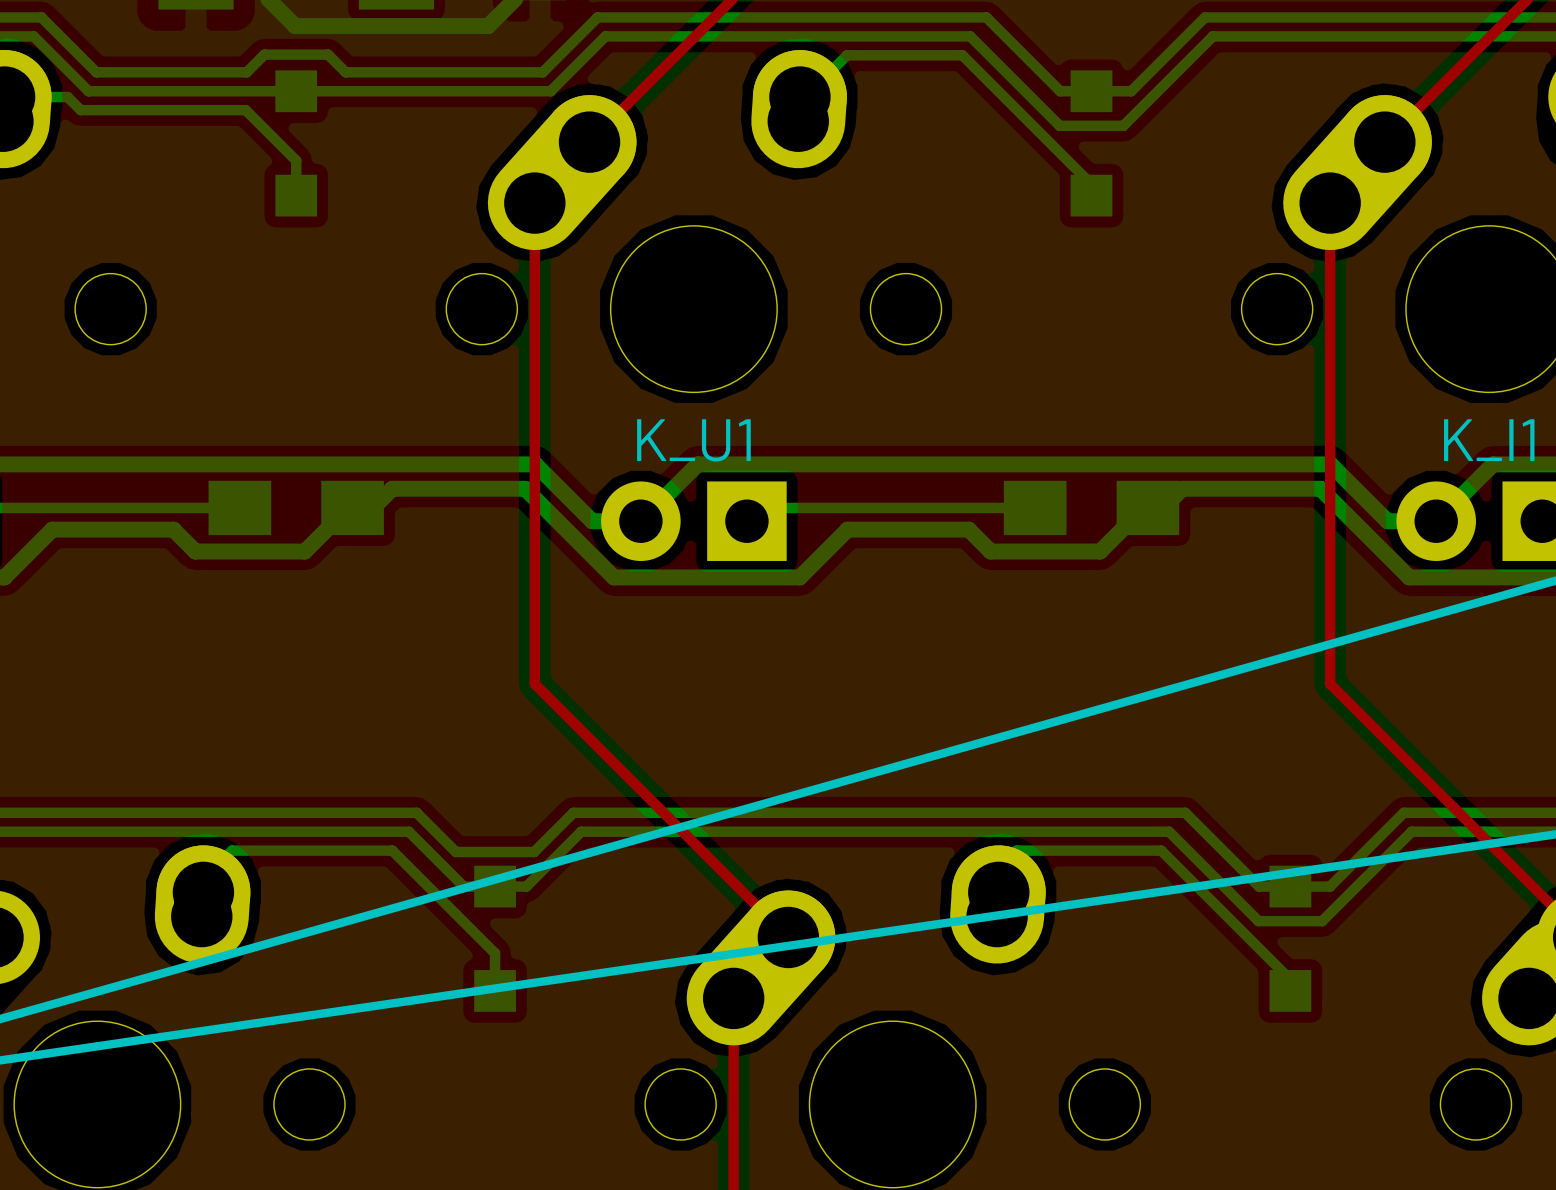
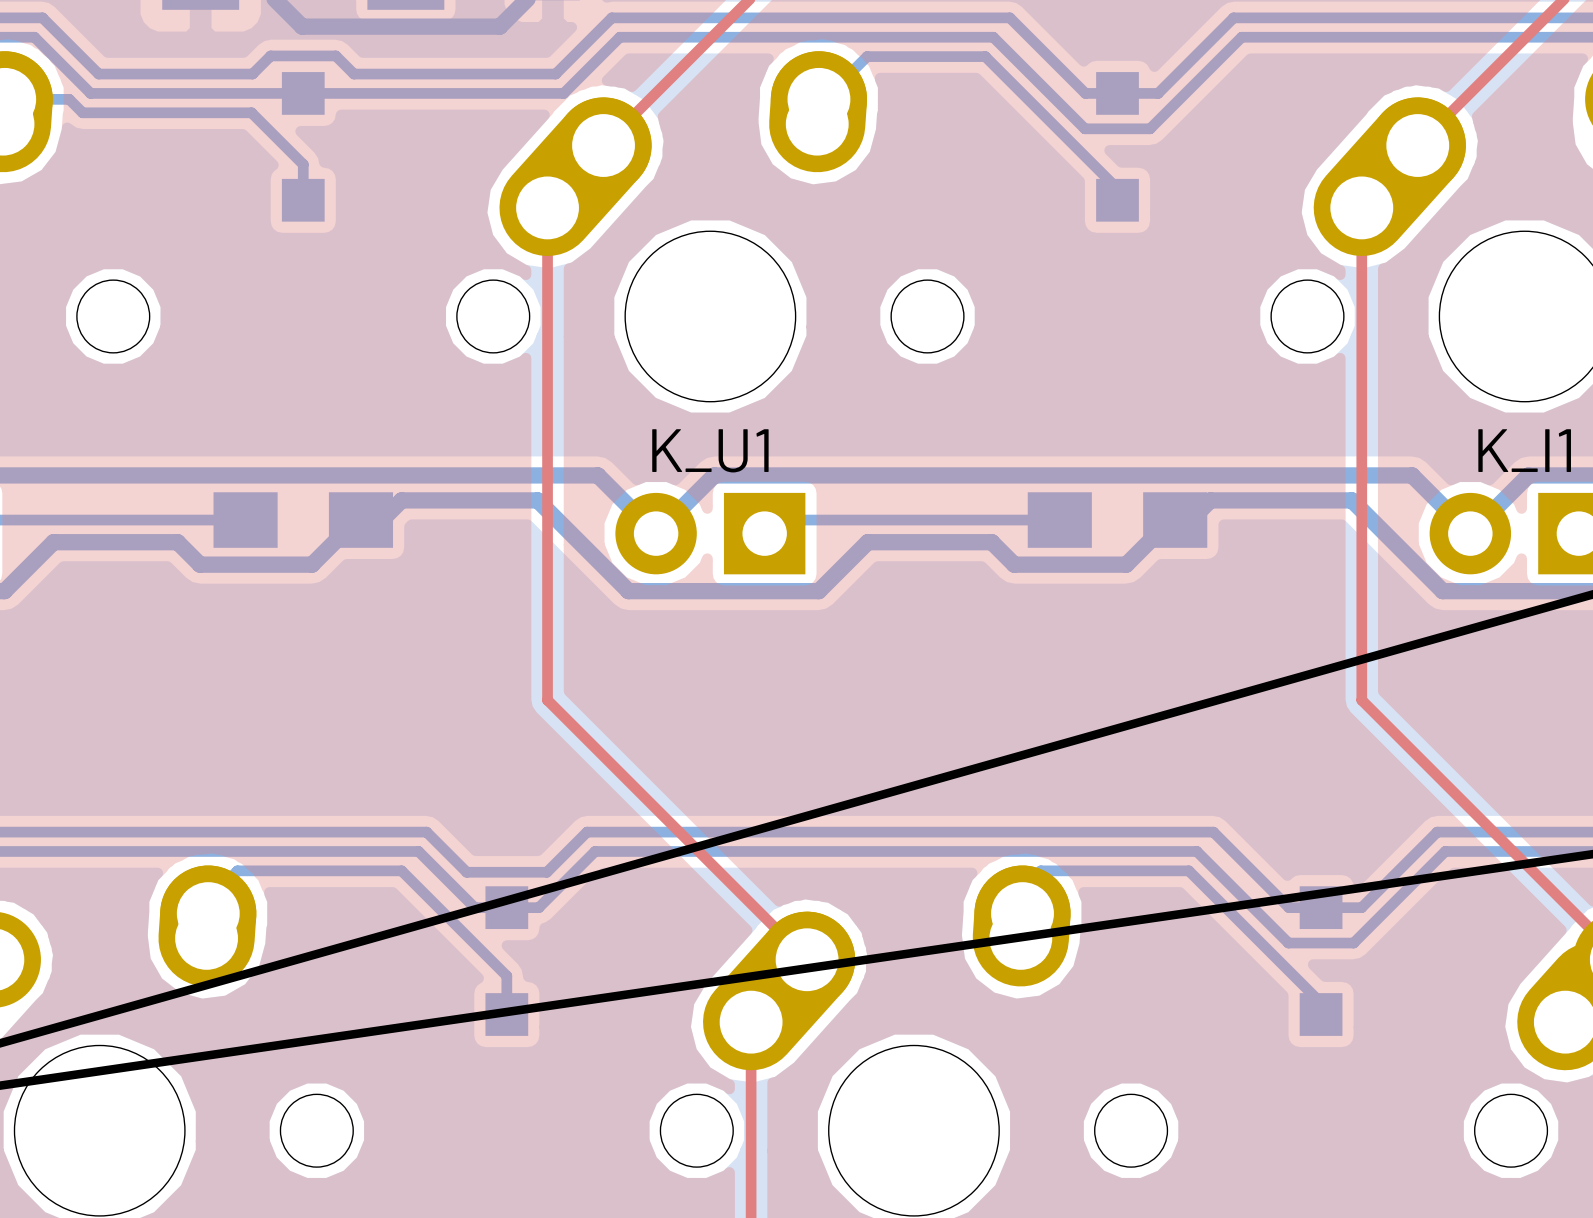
bottom track: (535, 464) (592, 521) (640, 521) -> (548, 475) (597, 475) (656, 533)
bottom track: (1330, 464) (1387, 521) (1436, 521) -> (1362, 475) (1412, 475) (1470, 533)

